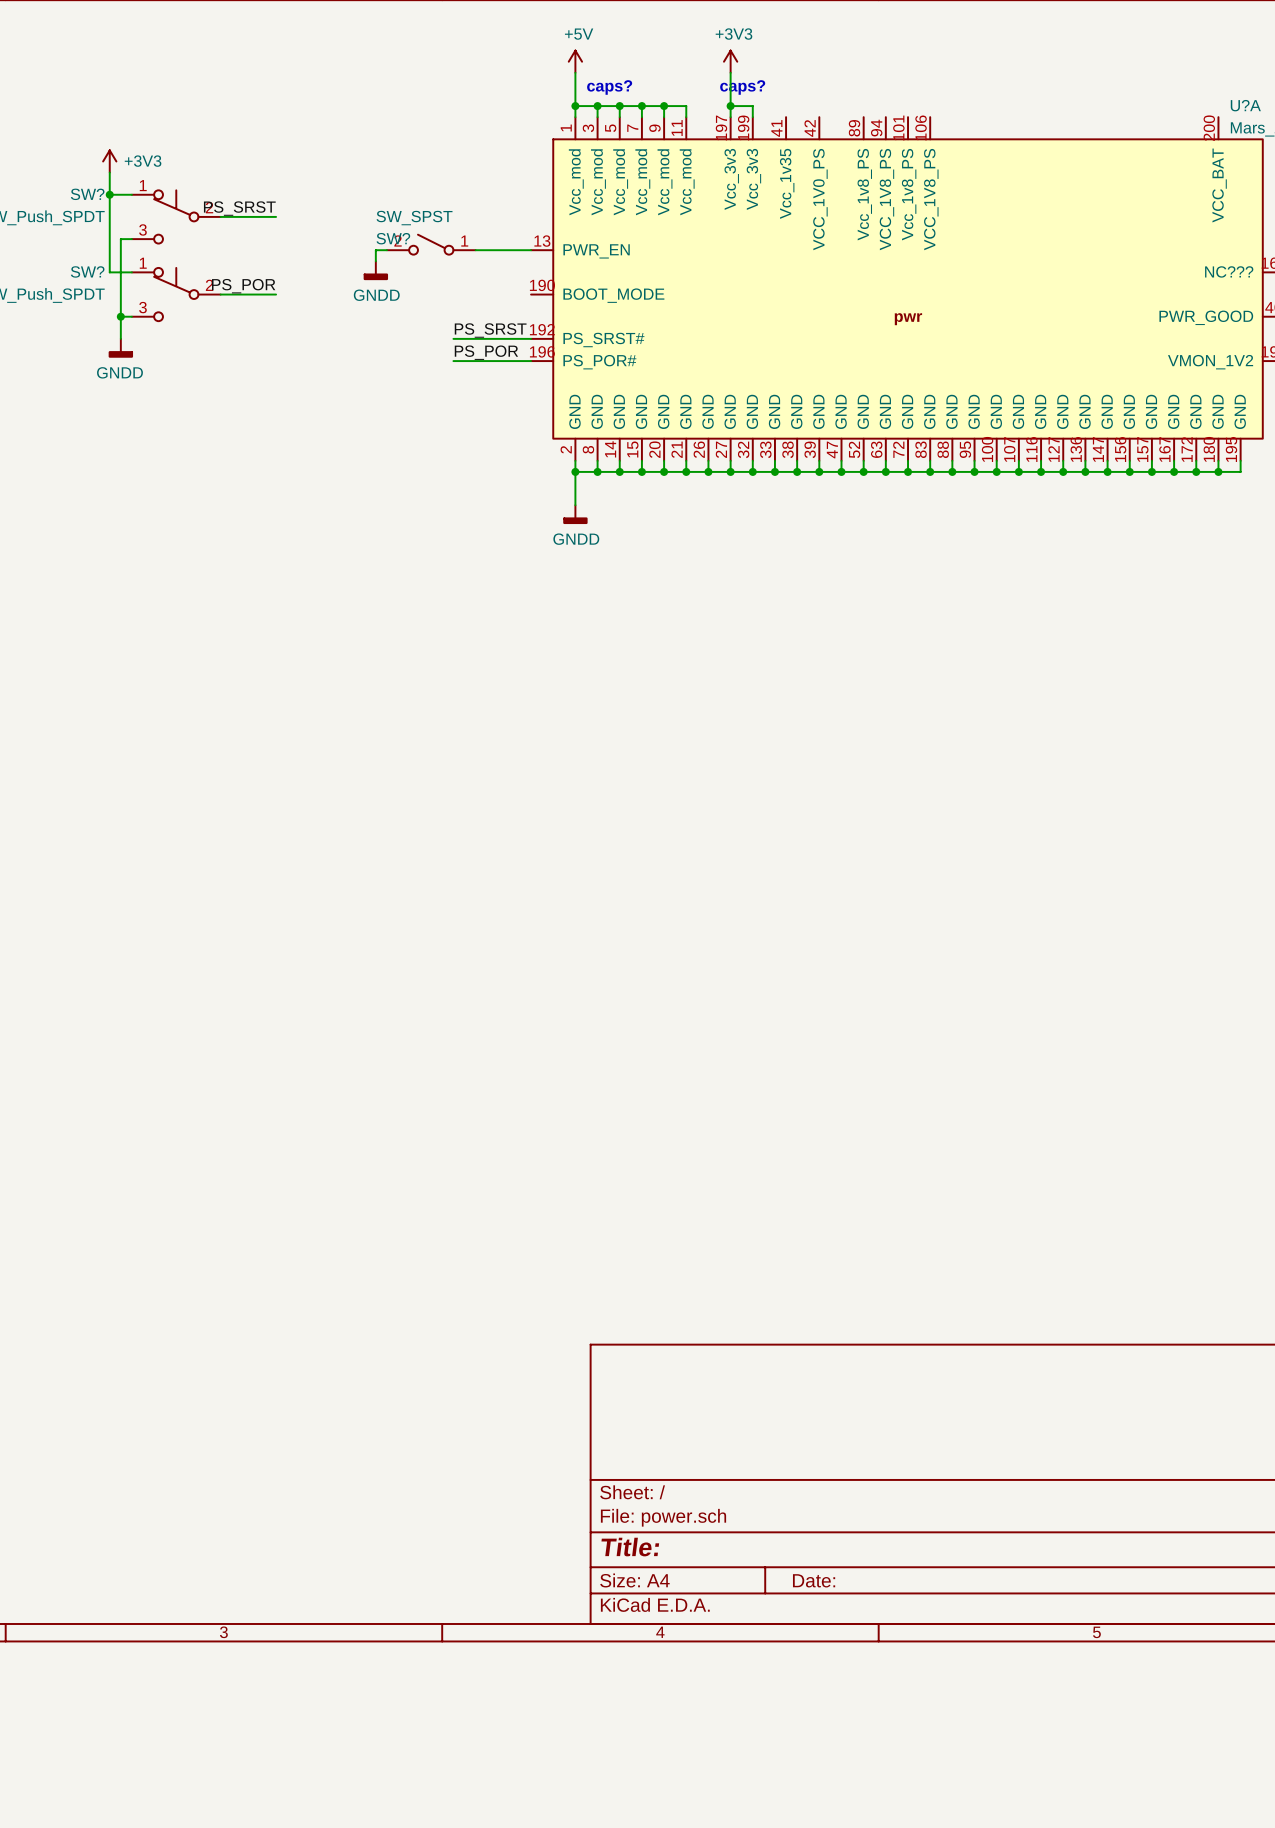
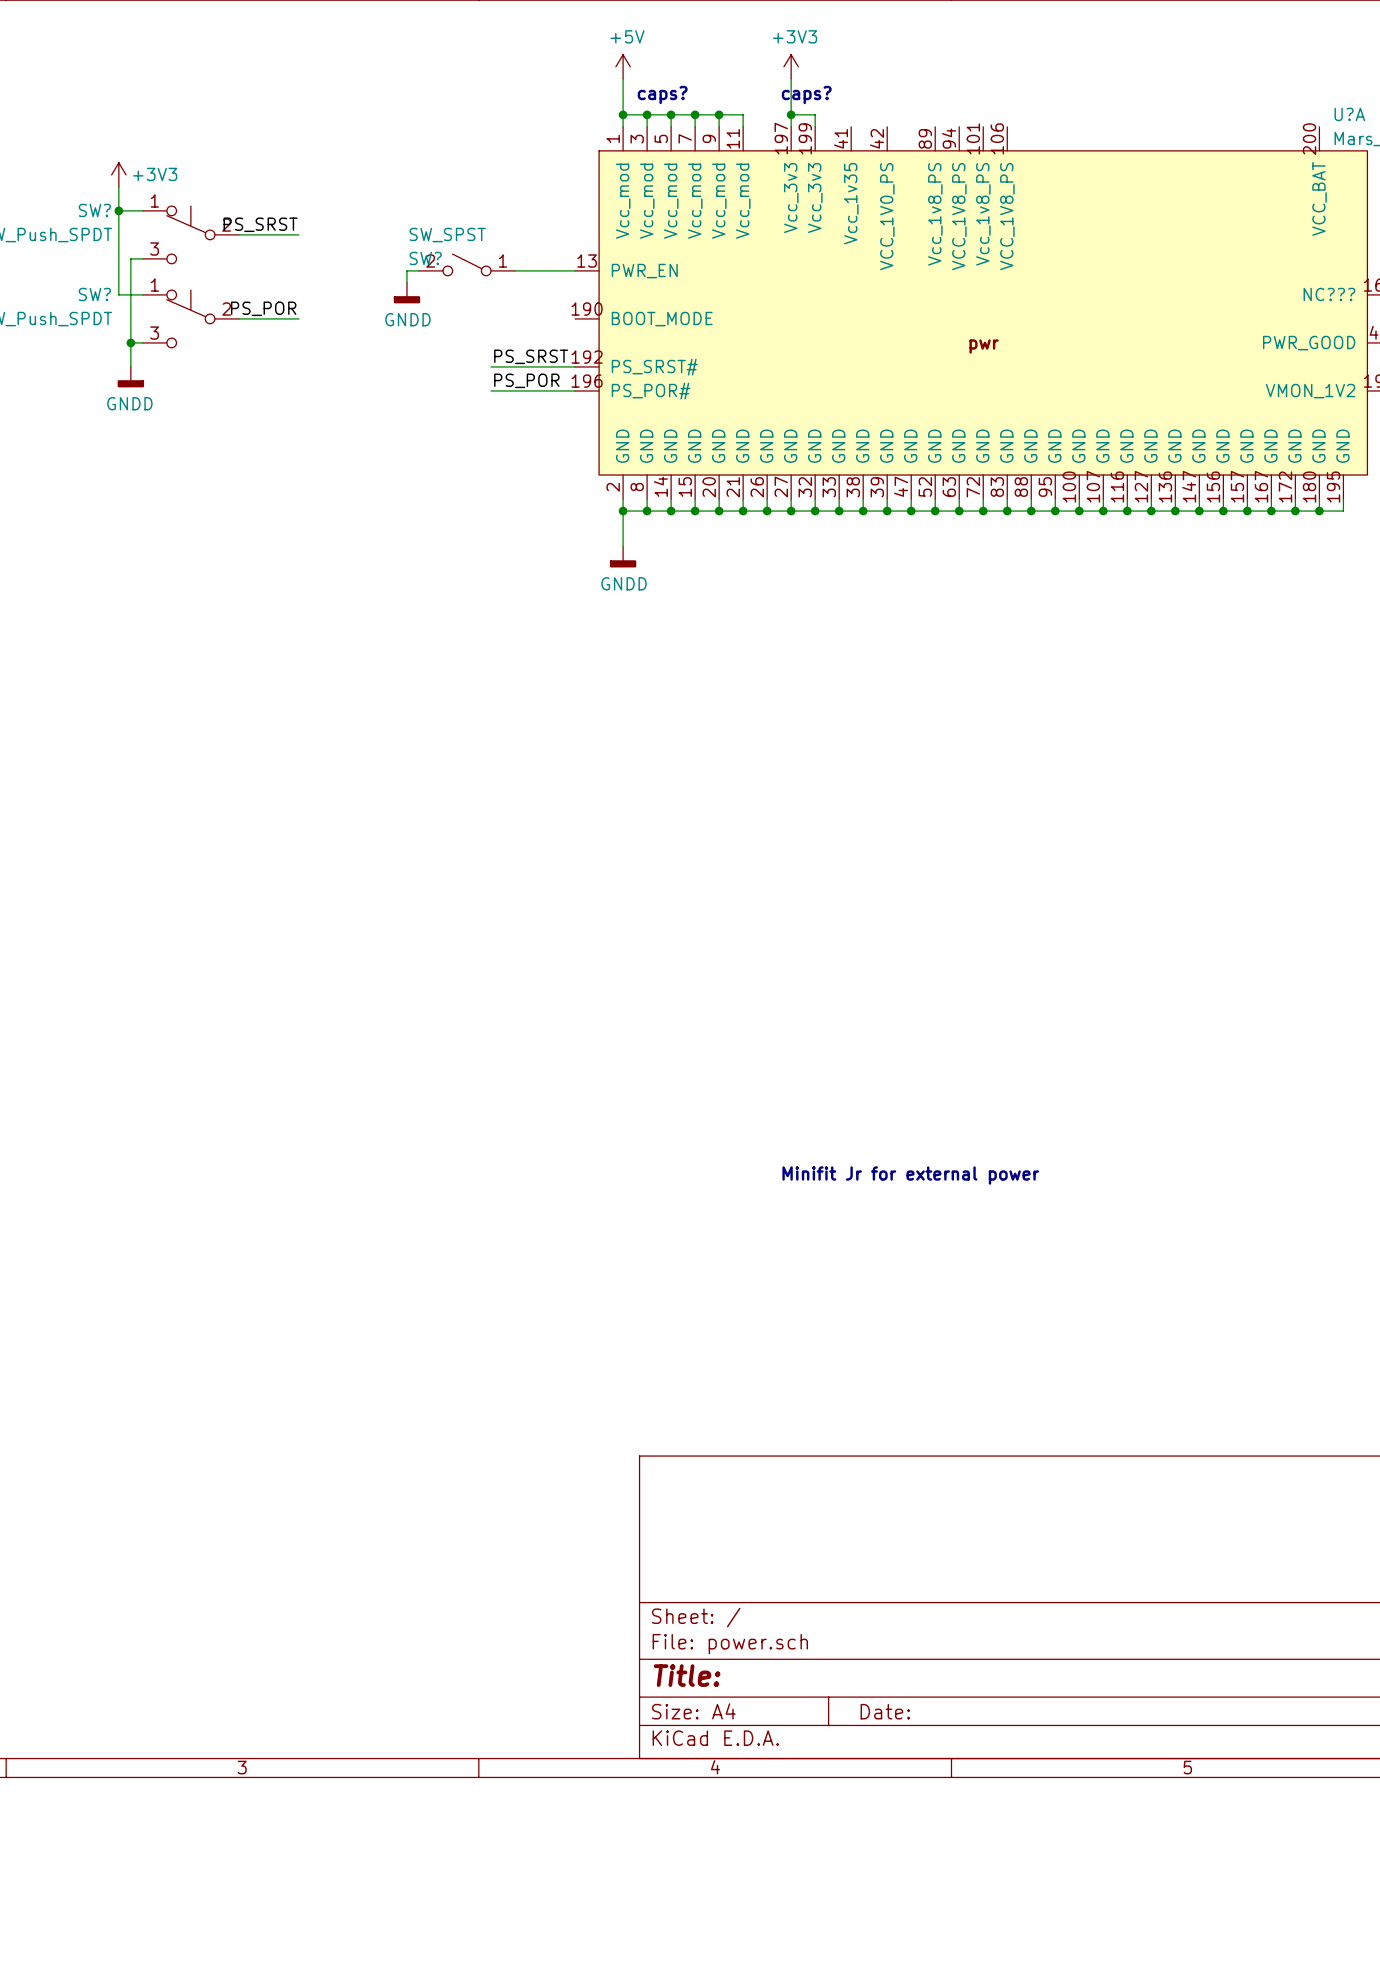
text: none -> Minifit Jr for external power (910, 1175)

